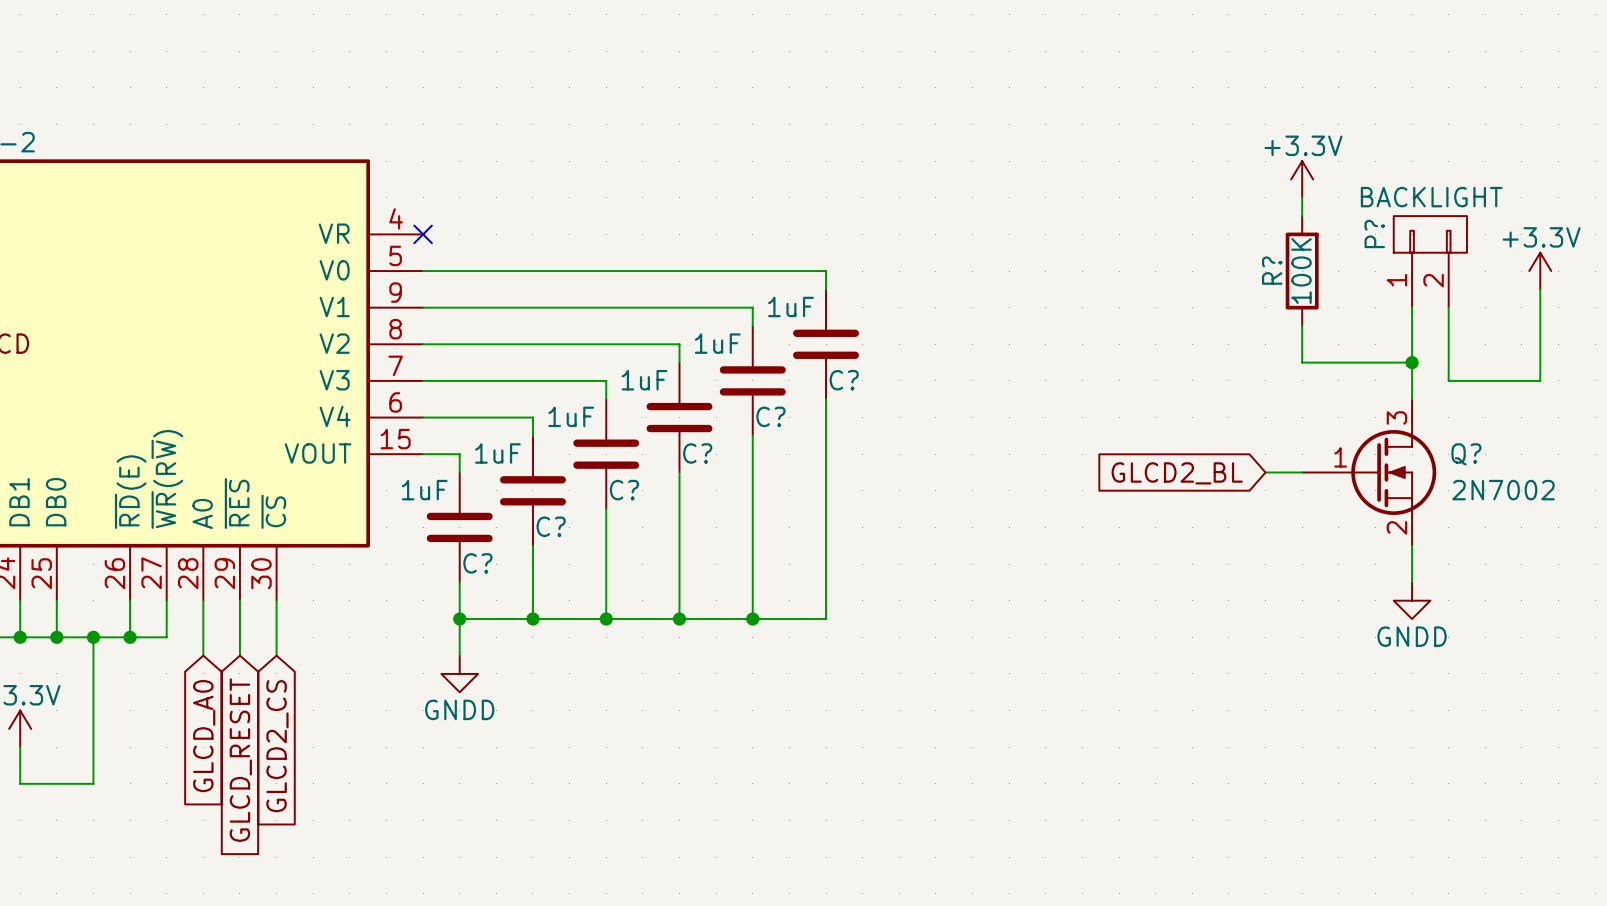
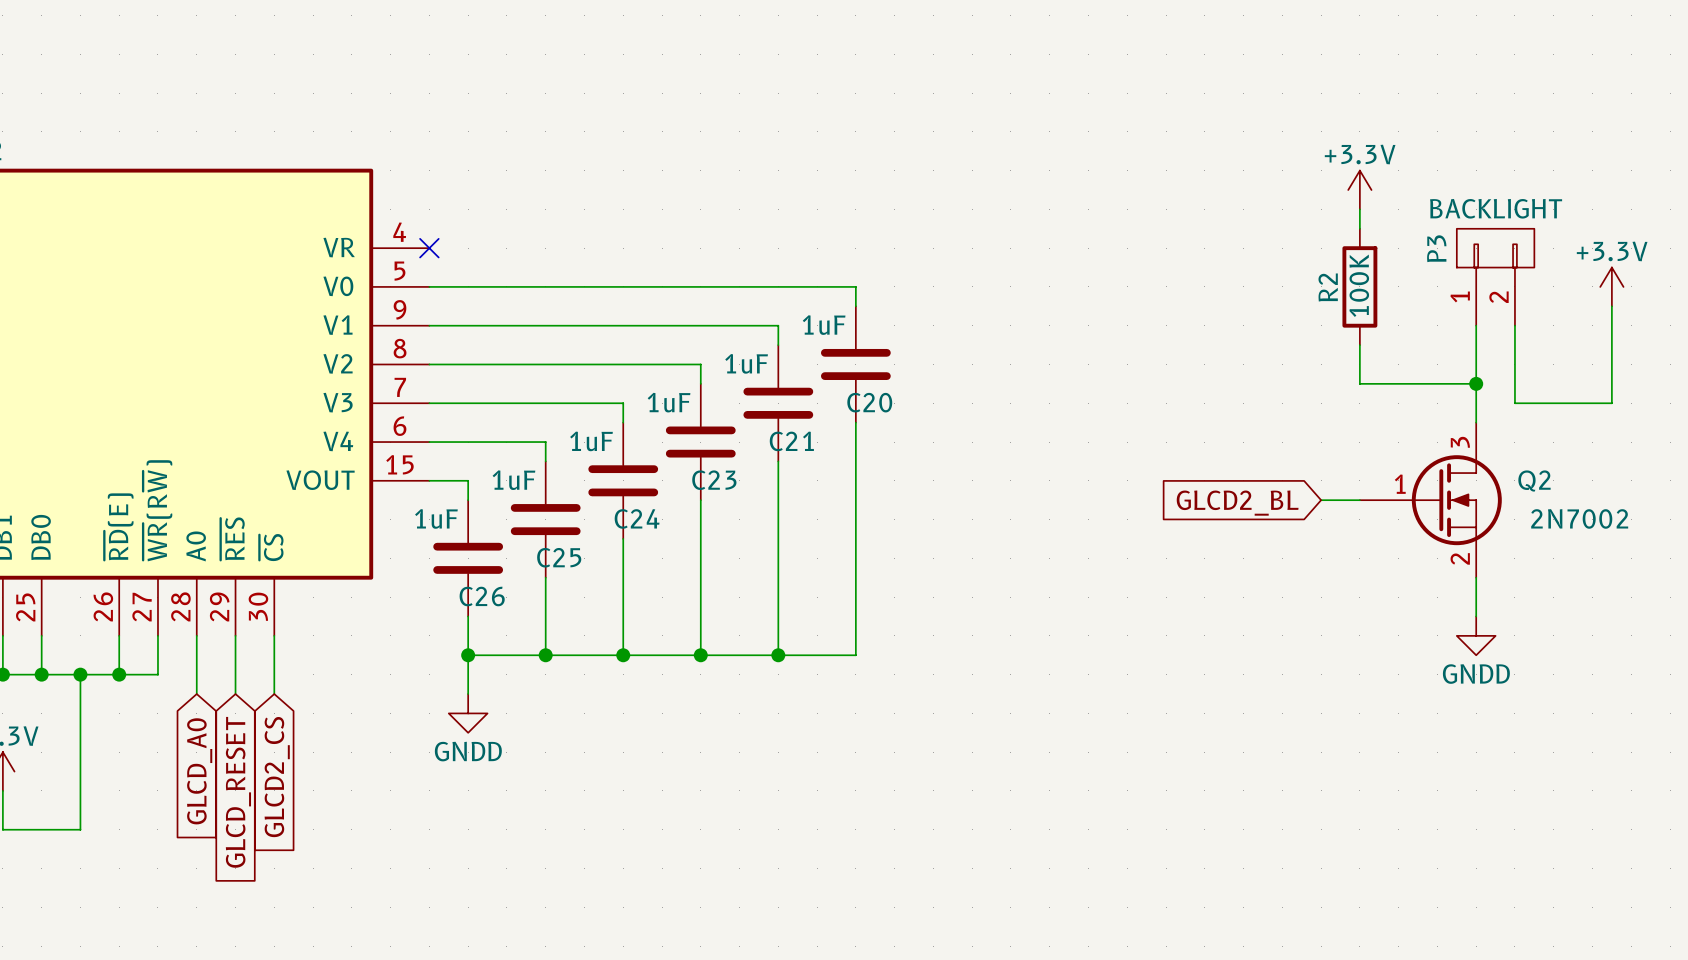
P? name: P? (1374, 233) -> P3 (1436, 248)
R? name: R? (1272, 270) -> R2 (1328, 287)
C? name: C? (844, 380) -> C20 (869, 402)
C? name: C? (770, 416) -> C21 (791, 441)
C? name: C? (697, 453) -> C23 (714, 480)
Q? name: Q? (1466, 454) -> Q2 (1534, 481)
C? name: C? (624, 490) -> C24 (637, 518)
C? name: C? (551, 526) -> C25 (559, 557)
C? name: C? (477, 563) -> C26 (482, 596)

